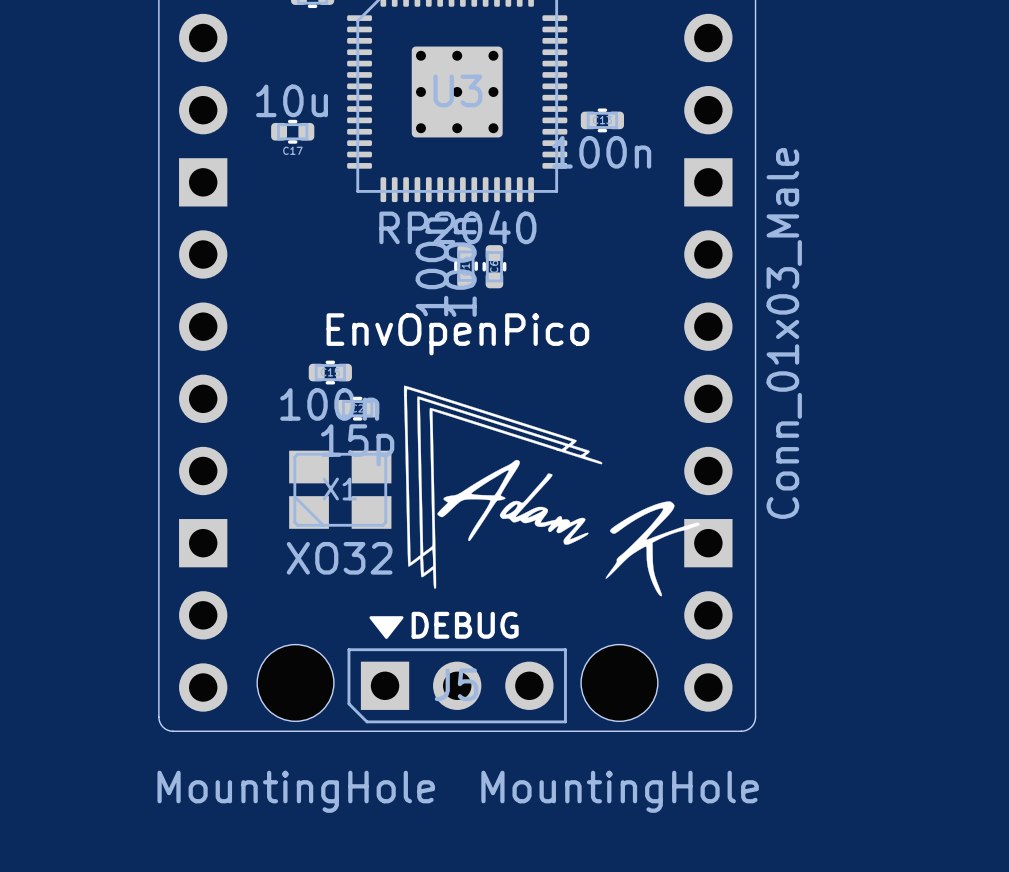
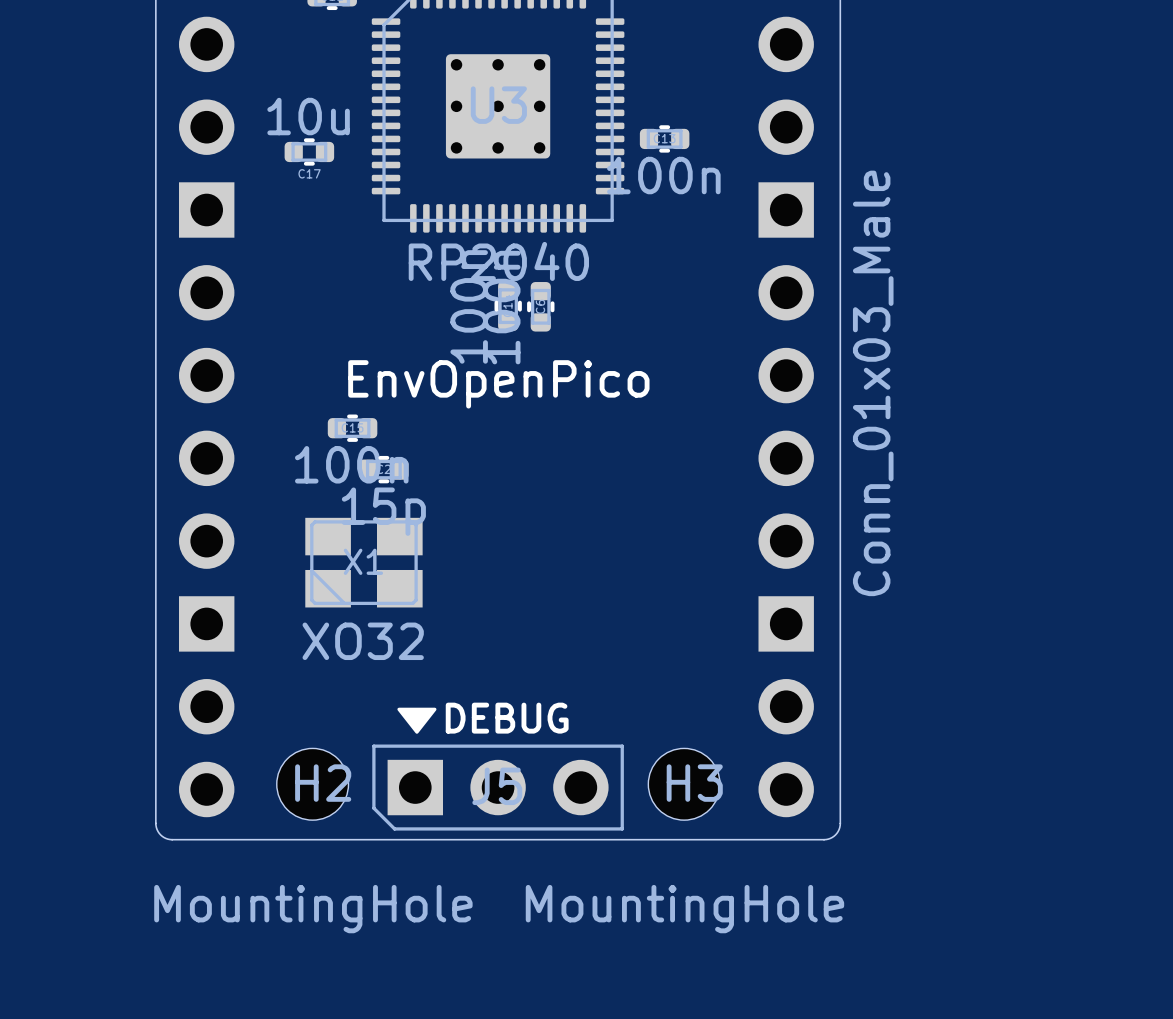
drawing: [403, 385, 700, 597] -> none
part: MountingHole (295, 682) -> none
H2: none -> MountingHole (312, 784)
part: MountingHole (619, 682) -> none
H3: none -> MountingHole (684, 784)

